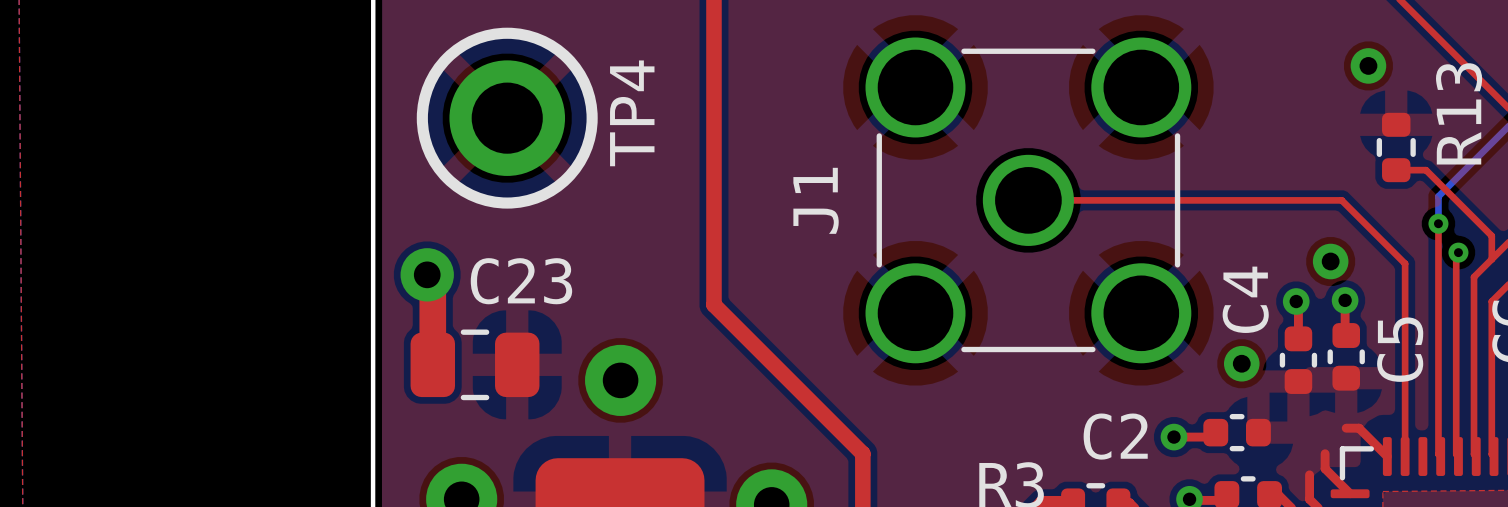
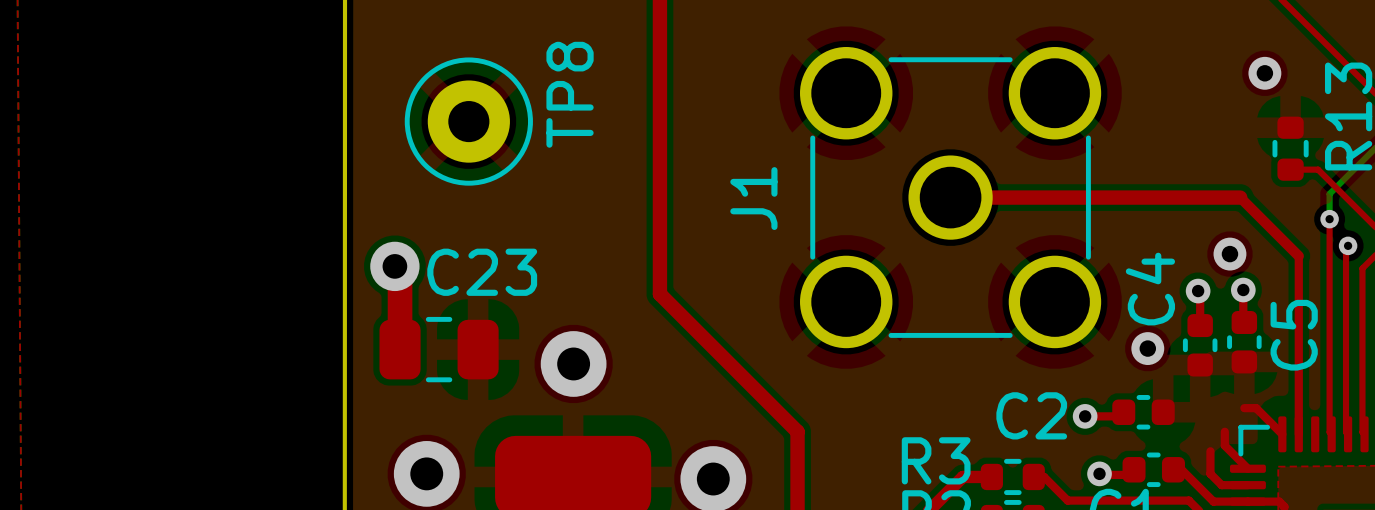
TP4: (507, 118) -> none
TP8: none -> (468, 121)
top track width: thin (1028, 200) (1341, 200) (1405, 263) (1405, 456) -> thick (950, 197) (1240, 197) (1298, 256) (1298, 434)

